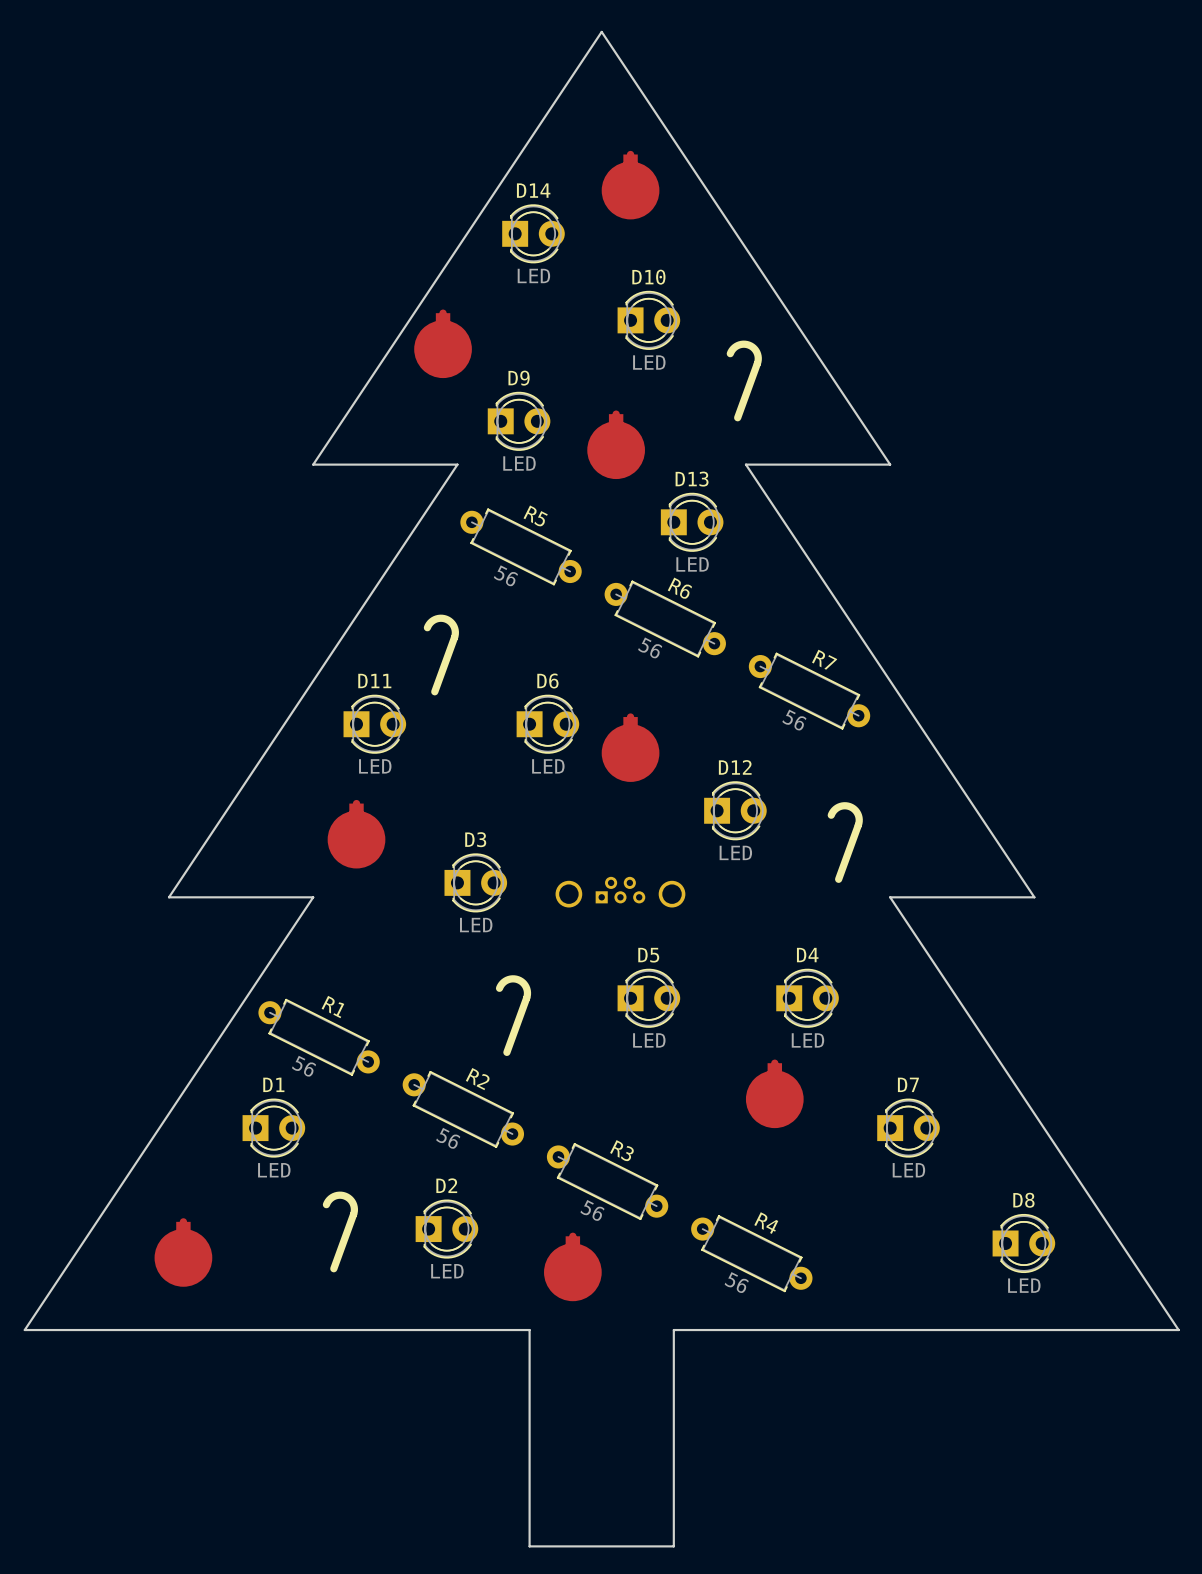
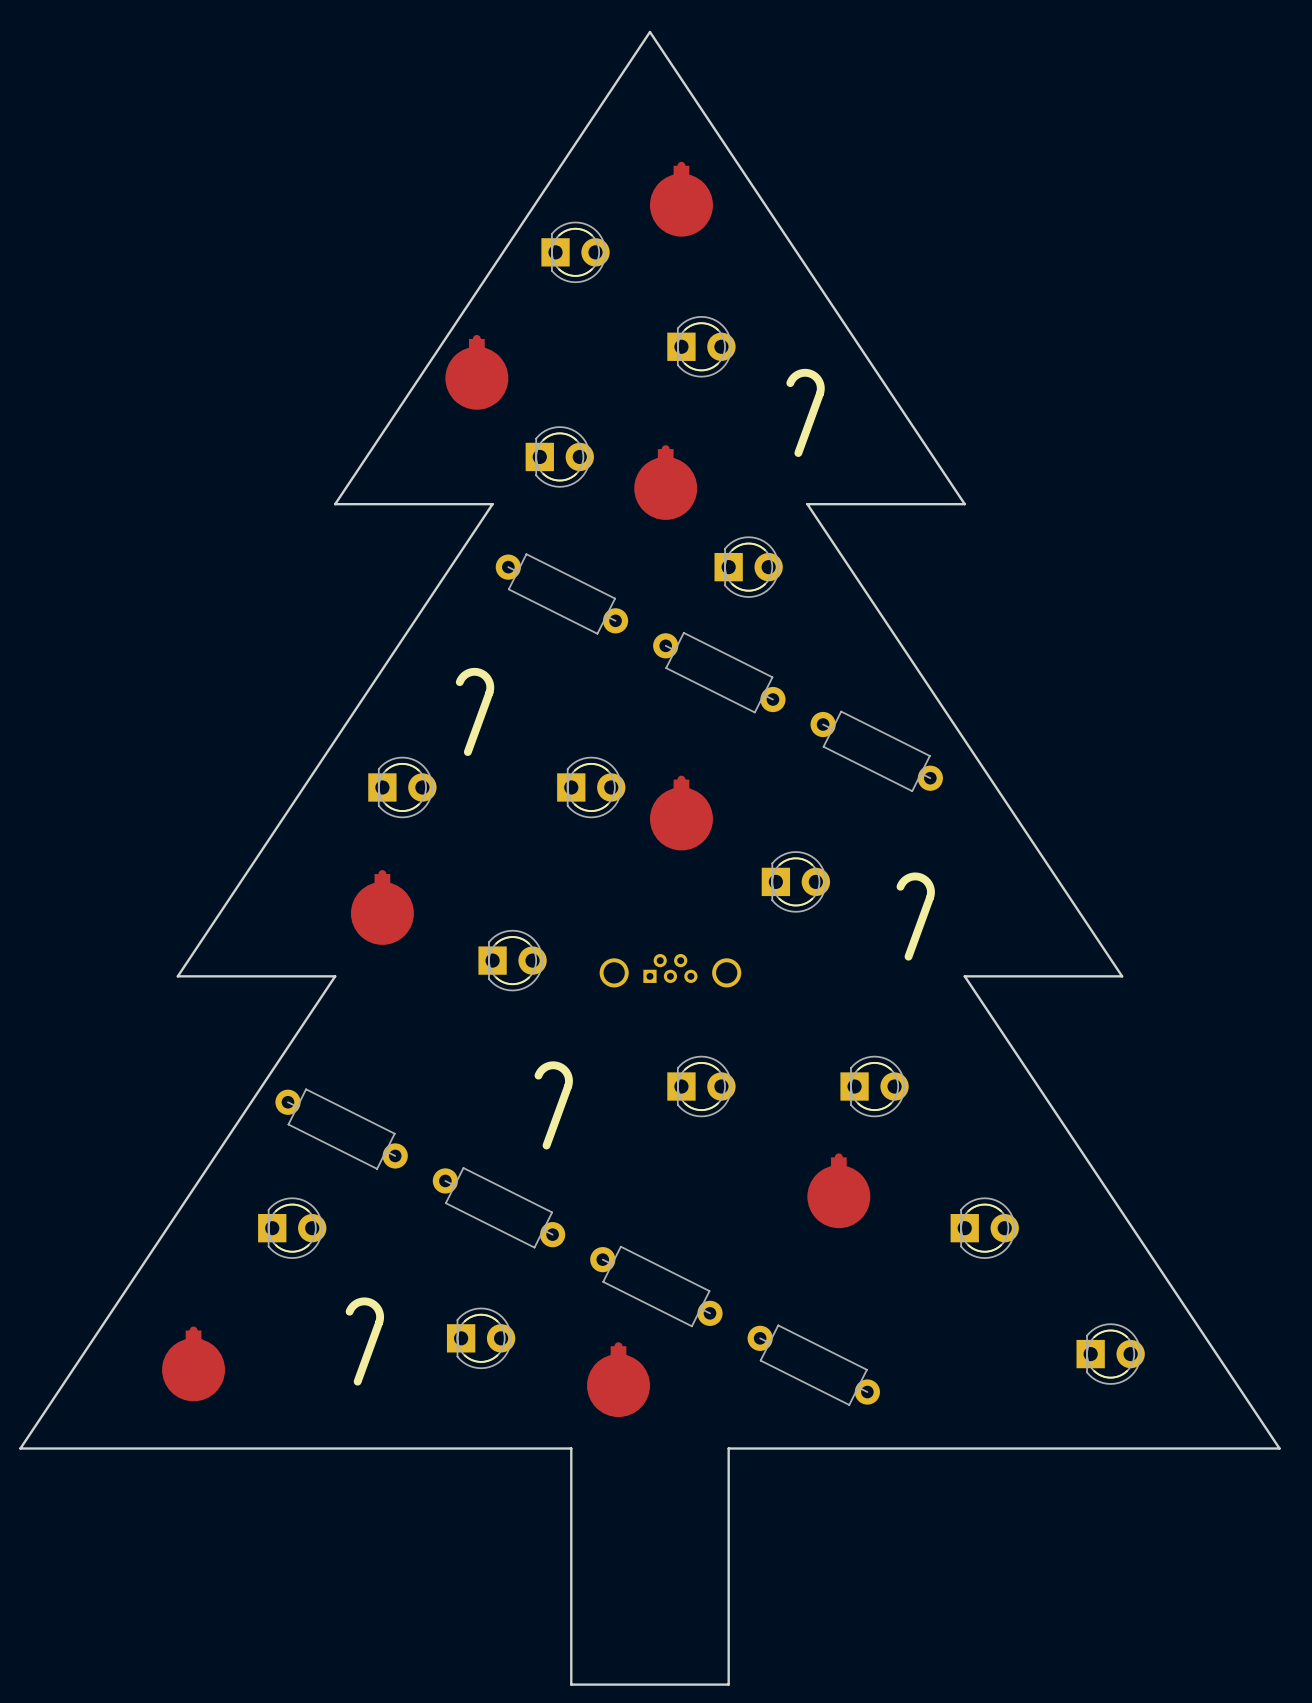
D14: LED (533, 233) -> none
part: none -> (575, 252)
D10: LED (648, 320) -> none
part: none -> (701, 346)
D9: LED (519, 421) -> none
part: none -> (559, 456)
D13: LED (692, 522) -> none
part: none -> (748, 567)
R5: 56 (521, 546) -> none
part: none -> (561, 593)
R6: 56 (665, 619) -> none
part: none -> (719, 672)
R7: 56 (809, 691) -> none
part: none -> (876, 751)
D11: LED (374, 724) -> none
part: none -> (402, 787)
D6: LED (547, 724) -> none
part: none -> (591, 787)
D12: LED (735, 810) -> none
part: none -> (795, 881)
D3: LED (475, 882) -> none
part: none -> (512, 960)
D5: LED (648, 998) -> none
part: none -> (701, 1086)
D4: LED (807, 998) -> none
part: none -> (874, 1086)
R1: 56 (319, 1037) -> none
part: none -> (341, 1129)
R2: 56 (463, 1109) -> none
part: none -> (498, 1207)
D1: LED (273, 1128) -> none
part: none -> (292, 1228)
D7: LED (908, 1128) -> none
part: none -> (984, 1228)
R3: 56 (607, 1181) -> none
part: none -> (656, 1286)
D2: LED (446, 1229) -> none
part: none -> (481, 1338)
D8: LED (1023, 1243) -> none
part: none -> (1110, 1354)
R4: 56 (751, 1253) -> none
part: none -> (813, 1365)

